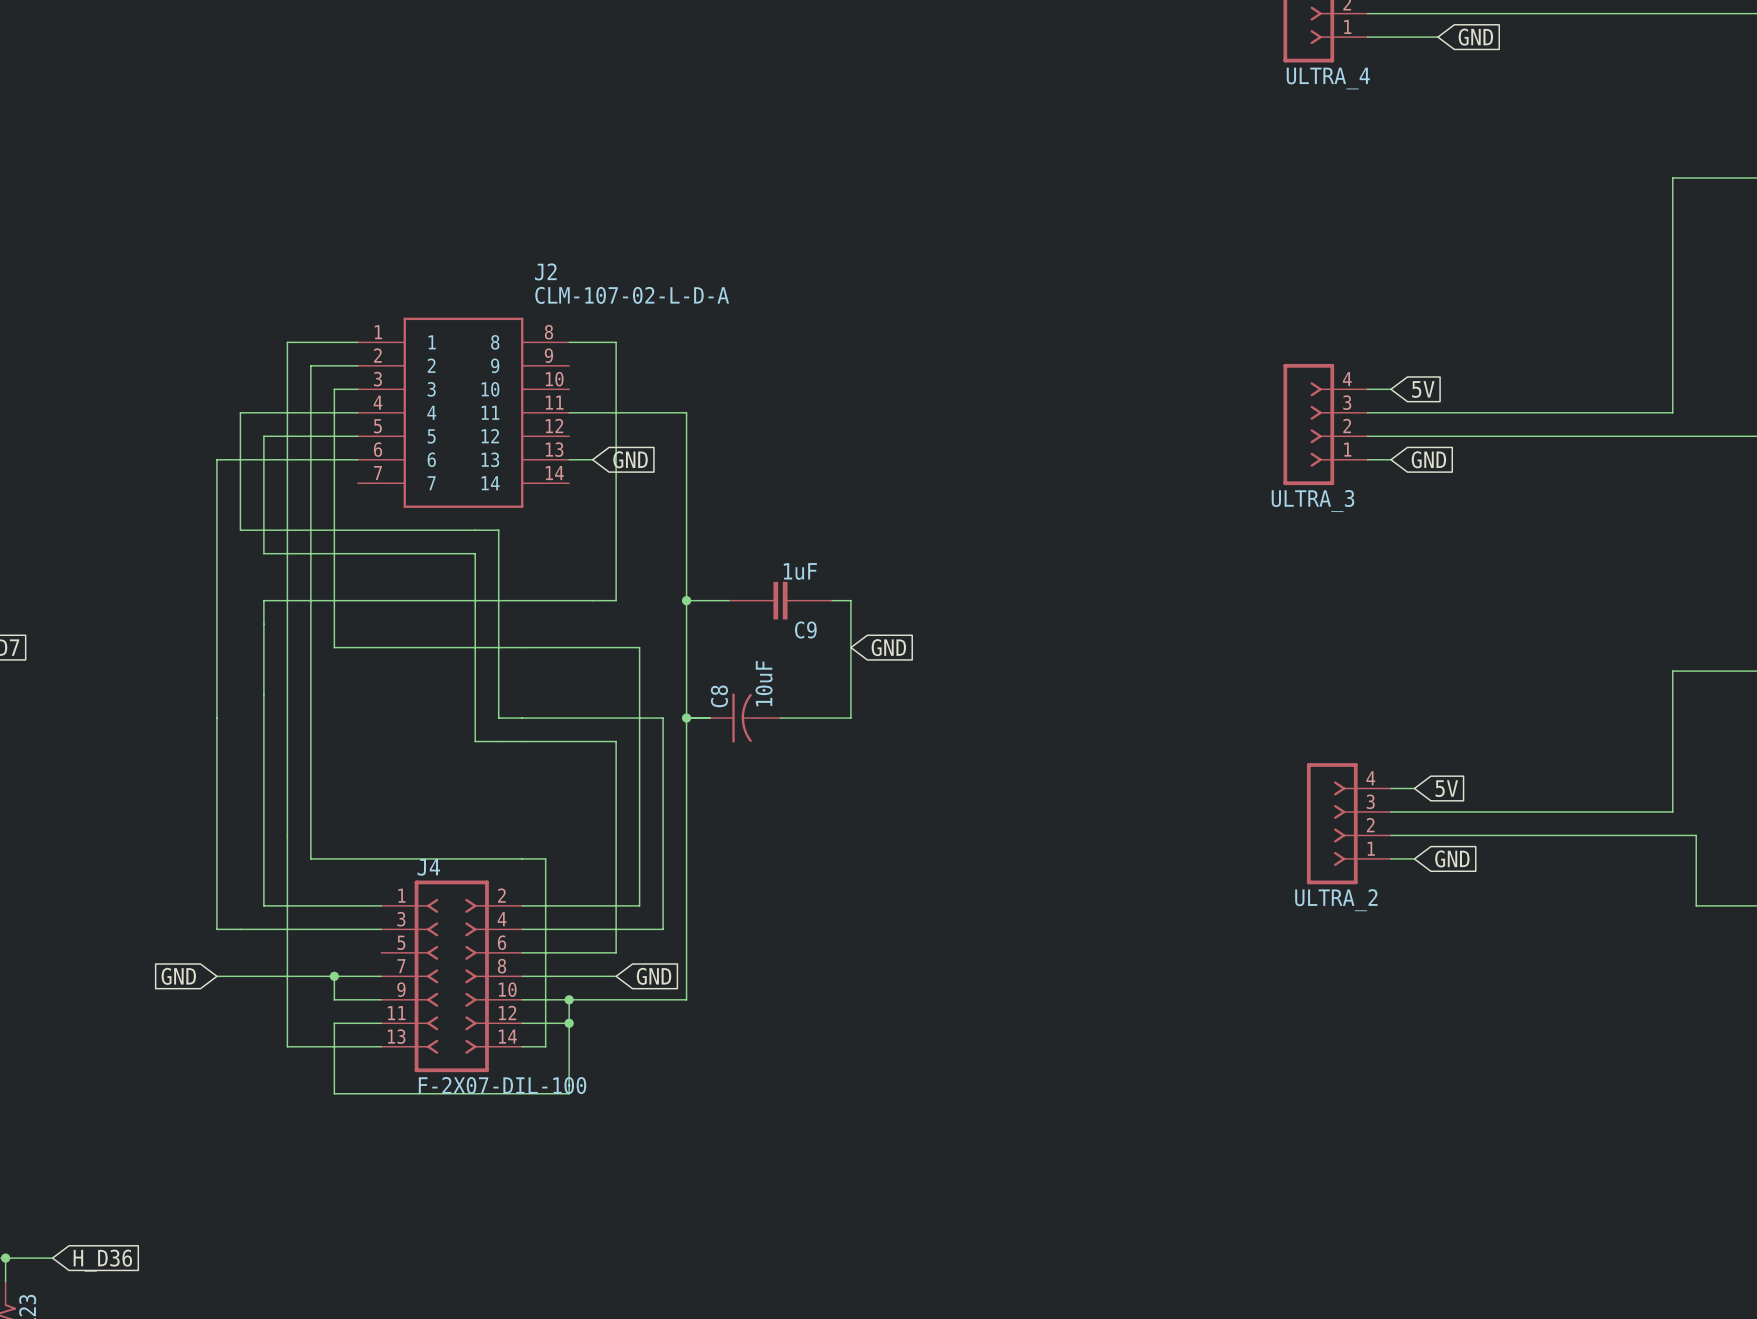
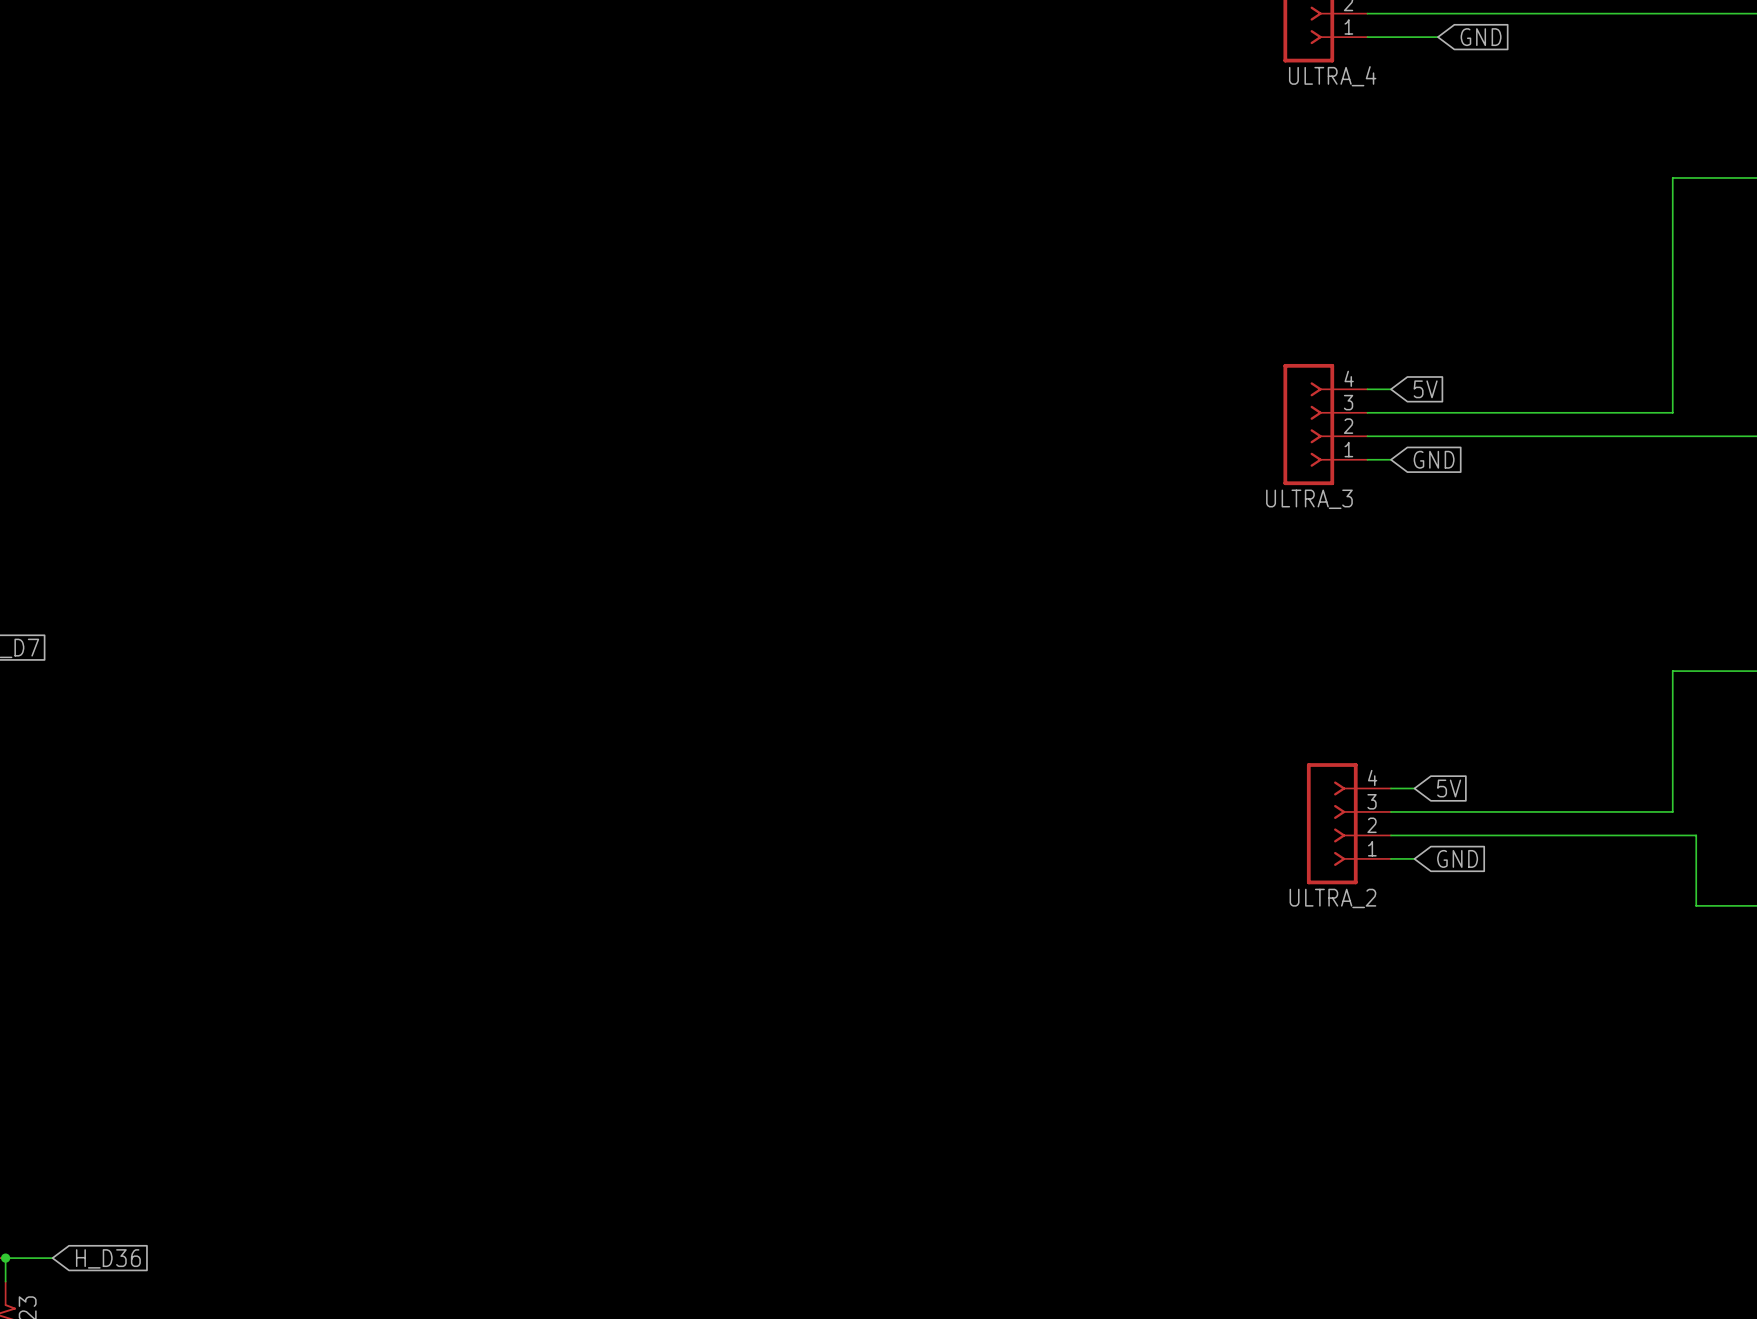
wire: (357, 342) (287, 342) (287, 1046) (381, 1046) -> none
wire: (569, 342) (616, 342) (616, 600) (263, 600) (263, 905) (381, 905) -> none
wire: (357, 365) (310, 365) (310, 858) (545, 858) (545, 1046) (522, 1046) -> none
wire: (357, 389) (334, 389) (334, 647) (639, 647) (639, 905) (522, 905) -> none
wire: (357, 412) (240, 412) (240, 530) (498, 530) (498, 718) (663, 718) (663, 929) (522, 929) -> none
J2: CLM-107-02-L-D-A (463, 412) -> none
wire: (569, 412) (686, 412) (686, 999) (522, 999) -> none
wire: (357, 436) (263, 436) (263, 553) (475, 553) (475, 741) (616, 741) (616, 952) (522, 952) -> none
wire: (357, 459) (216, 459) (216, 929) (381, 929) -> none
wire: (569, 459) (592, 459) -> none
global label: GND (630, 459) -> none
wire: (686, 600) (728, 600) -> none
junction: (686, 600) -> none
C9: 1uF (780, 600) -> none
wire: (832, 600) (850, 600) (850, 718) (780, 718) -> none
global label: GND (888, 647) -> none
wire: (686, 718) (710, 718) -> none
junction: (686, 718) -> none
C8: 10uF (745, 718) -> none
global label: GND (178, 976) -> none
wire: (216, 976) (381, 976) -> none
wire: (334, 976) (334, 999) (381, 999) -> none
junction: (334, 976) -> none
J4: F-2X07-DIL-100 (451, 976) -> none
wire: (522, 976) (616, 976) -> none
global label: GND (654, 976) -> none
wire: (569, 999) (569, 1093) (334, 1093) (334, 1023) (381, 1023) -> none
junction: (569, 999) -> none
wire: (522, 1023) (569, 1023) -> none
junction: (569, 1023) -> none

